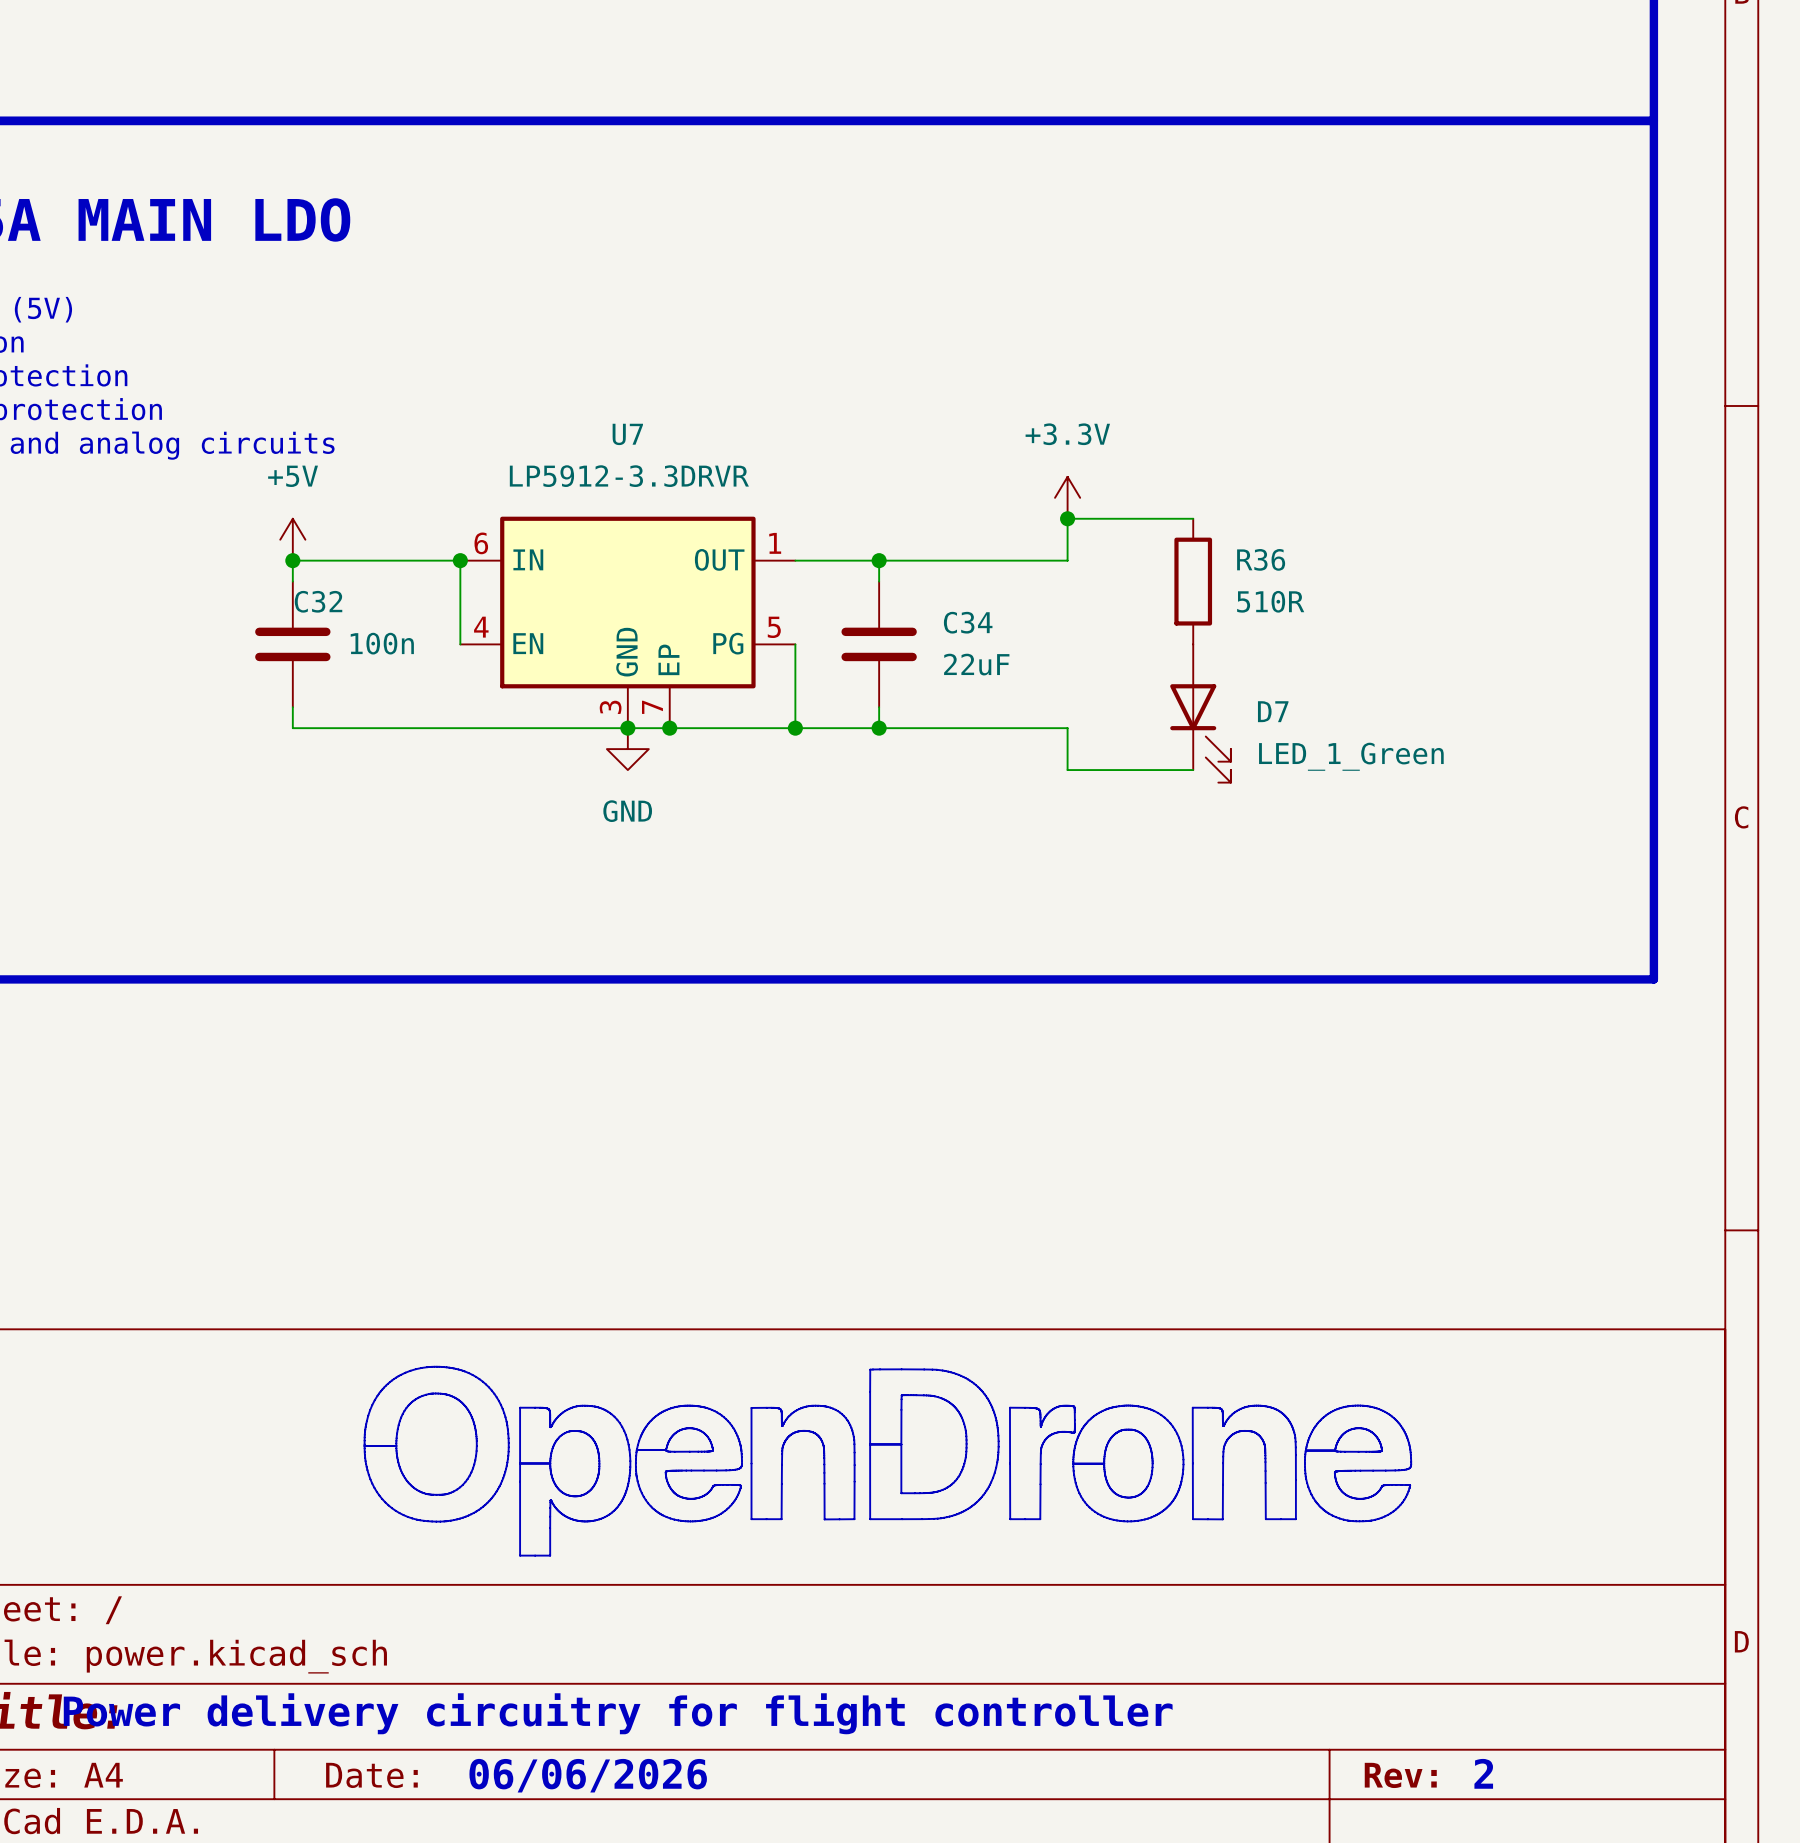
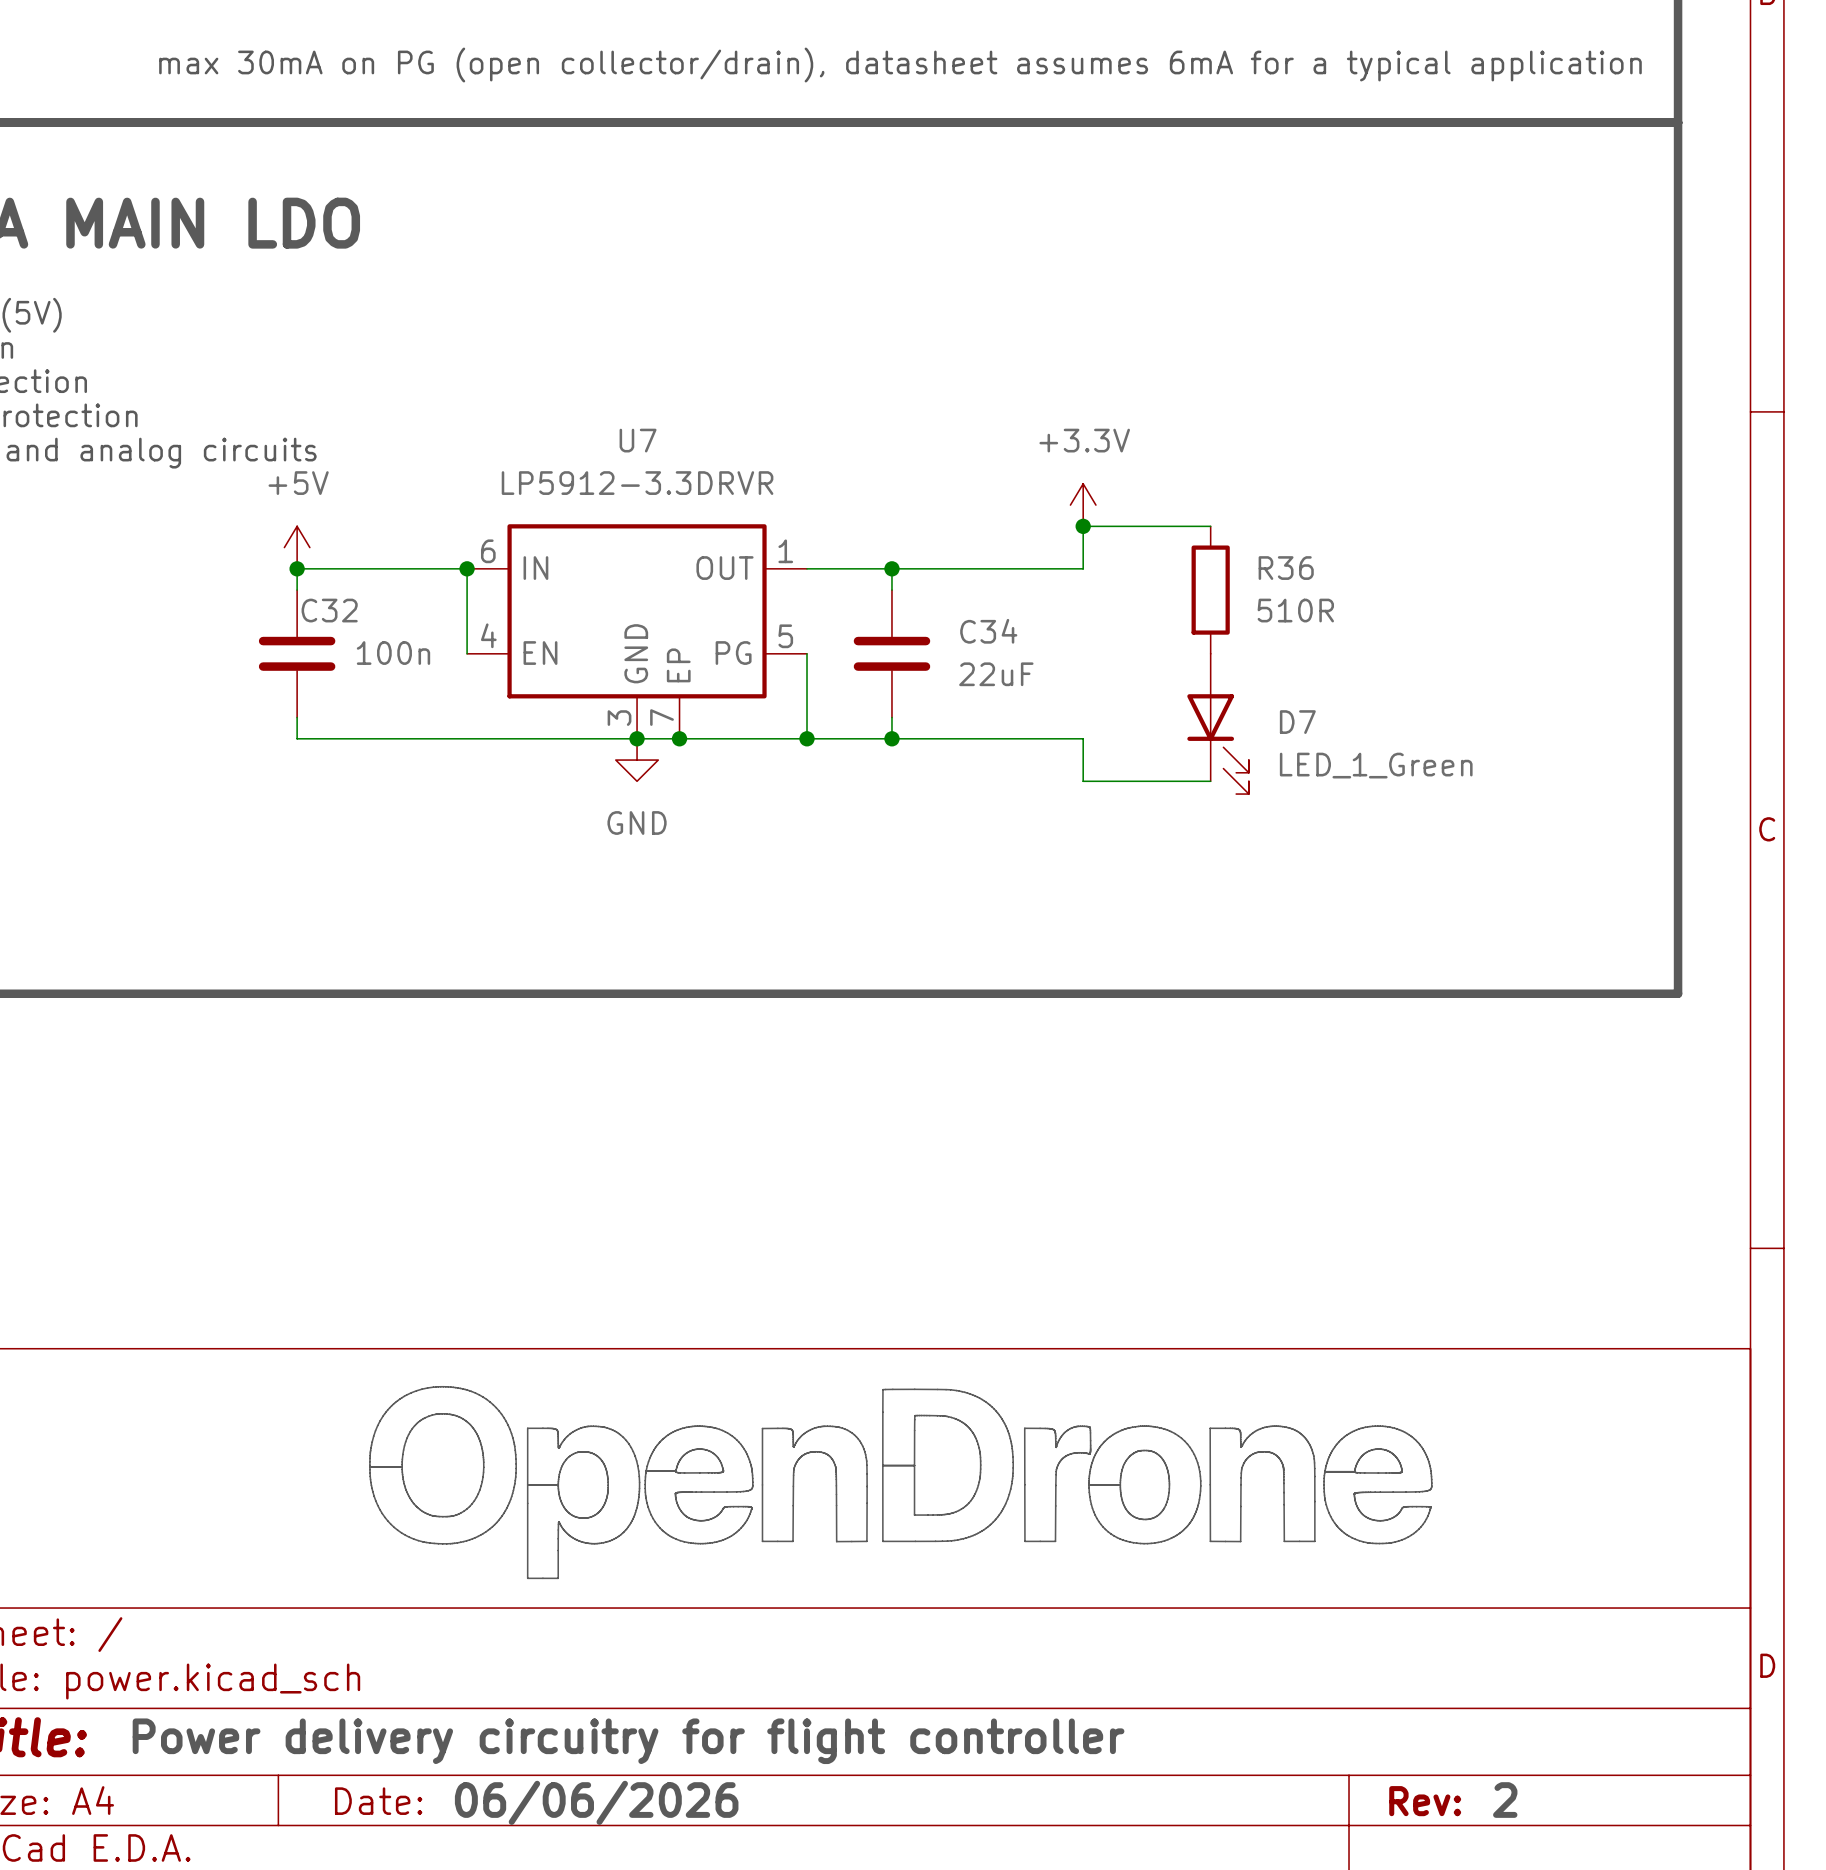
text: none -> max 30mA on PG (open collector/drain), datasheet assumes 6mA for a typical application (900, 65)

